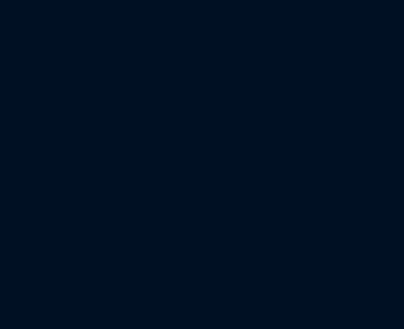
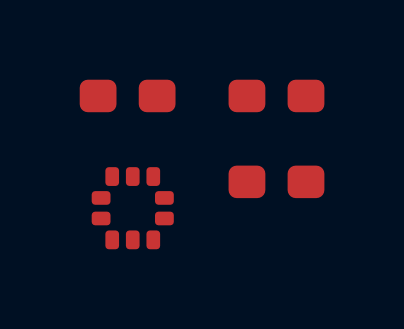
part: none -> (127, 95)
part: none -> (276, 95)
part: none -> (276, 181)
part: none -> (132, 208)

